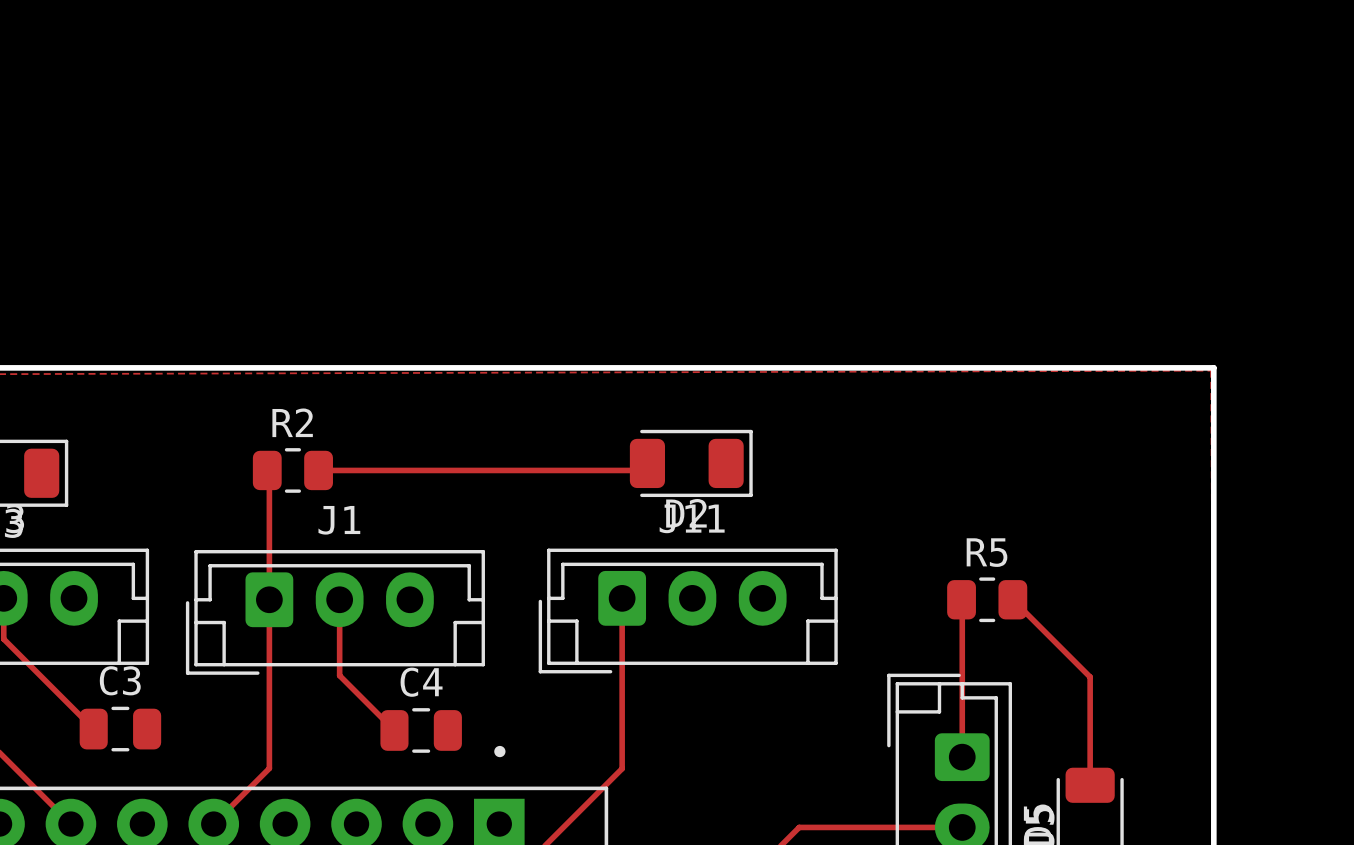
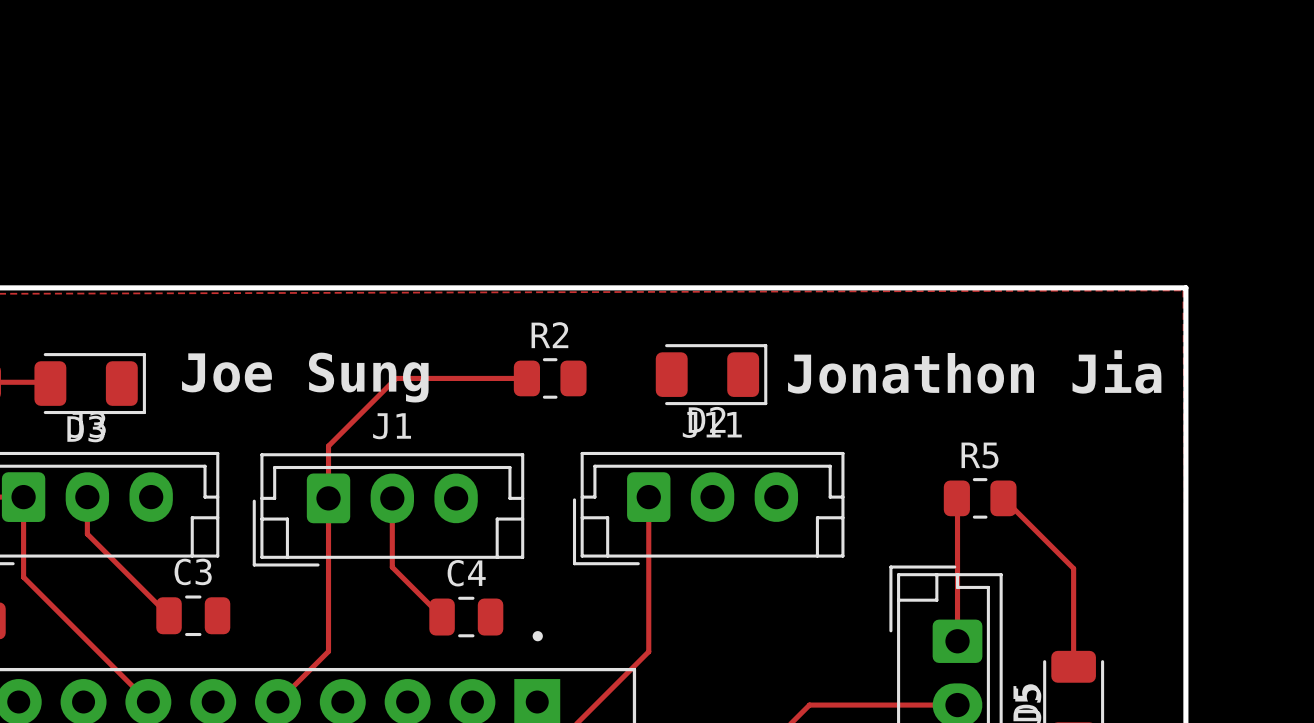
text: none -> Jonathon Jia (974, 371)
text: none -> Joe Sung (305, 377)
track: (267, 470) (269, 472) (269, 542) -> (526, 378) (396, 378) (328, 446)
R2 position: (292, 470) -> (550, 378)
track: (318, 470) (640, 470) -> none

